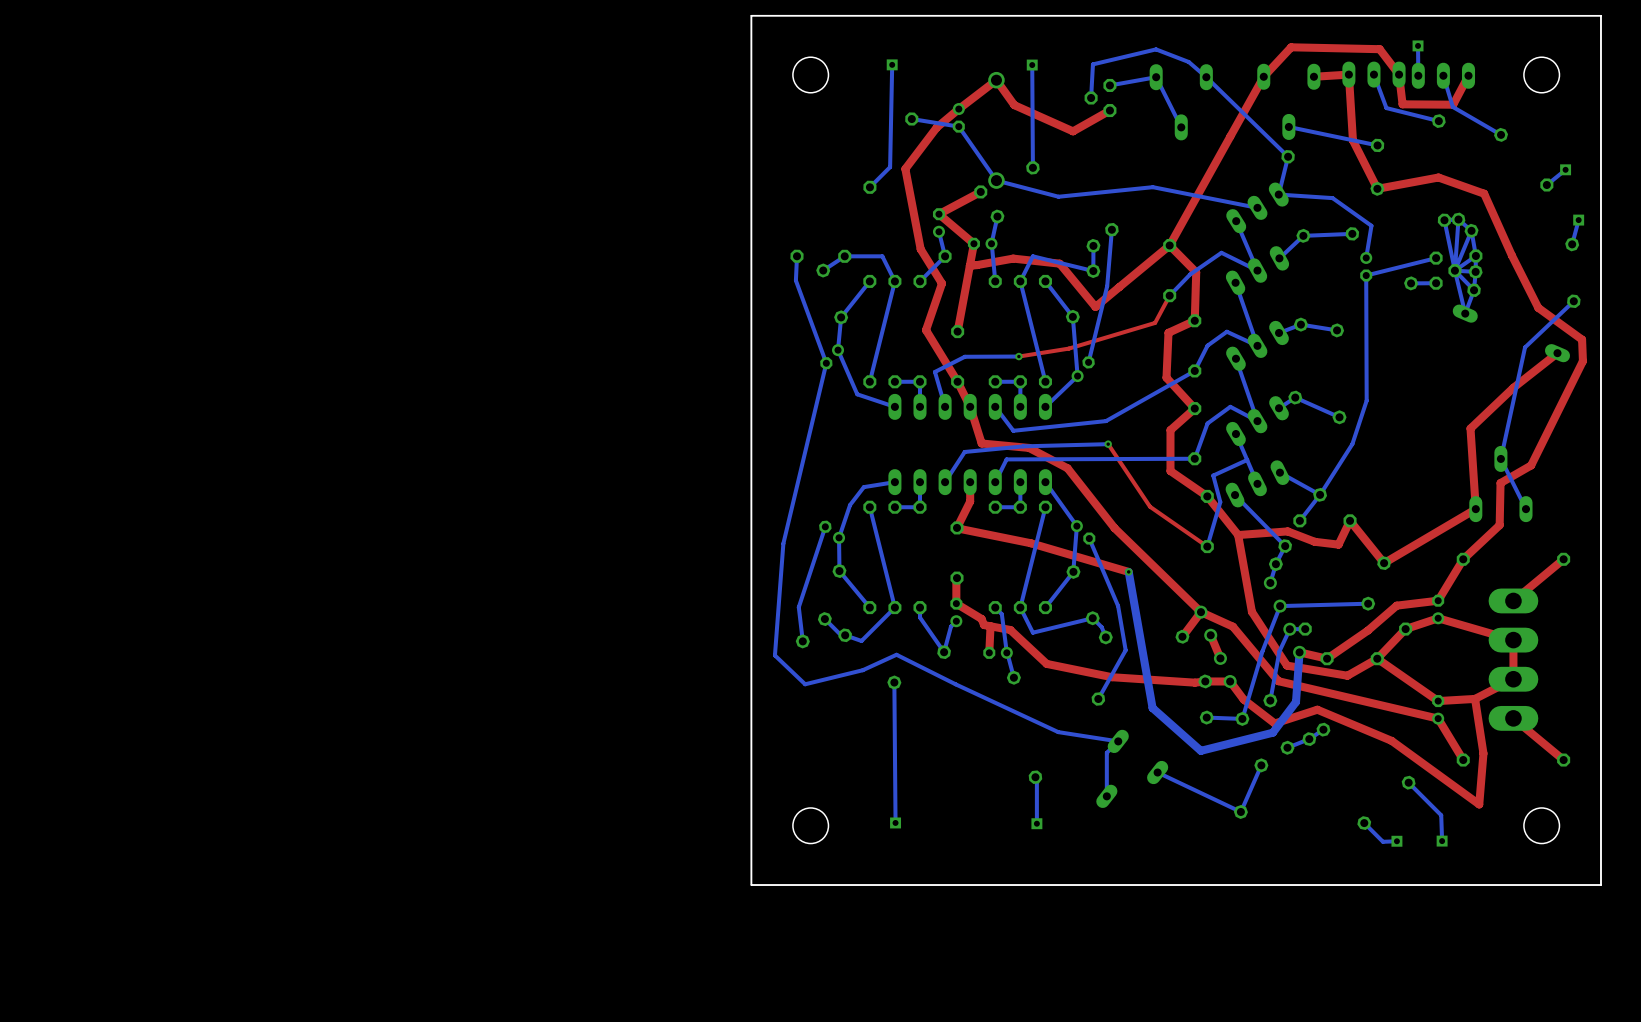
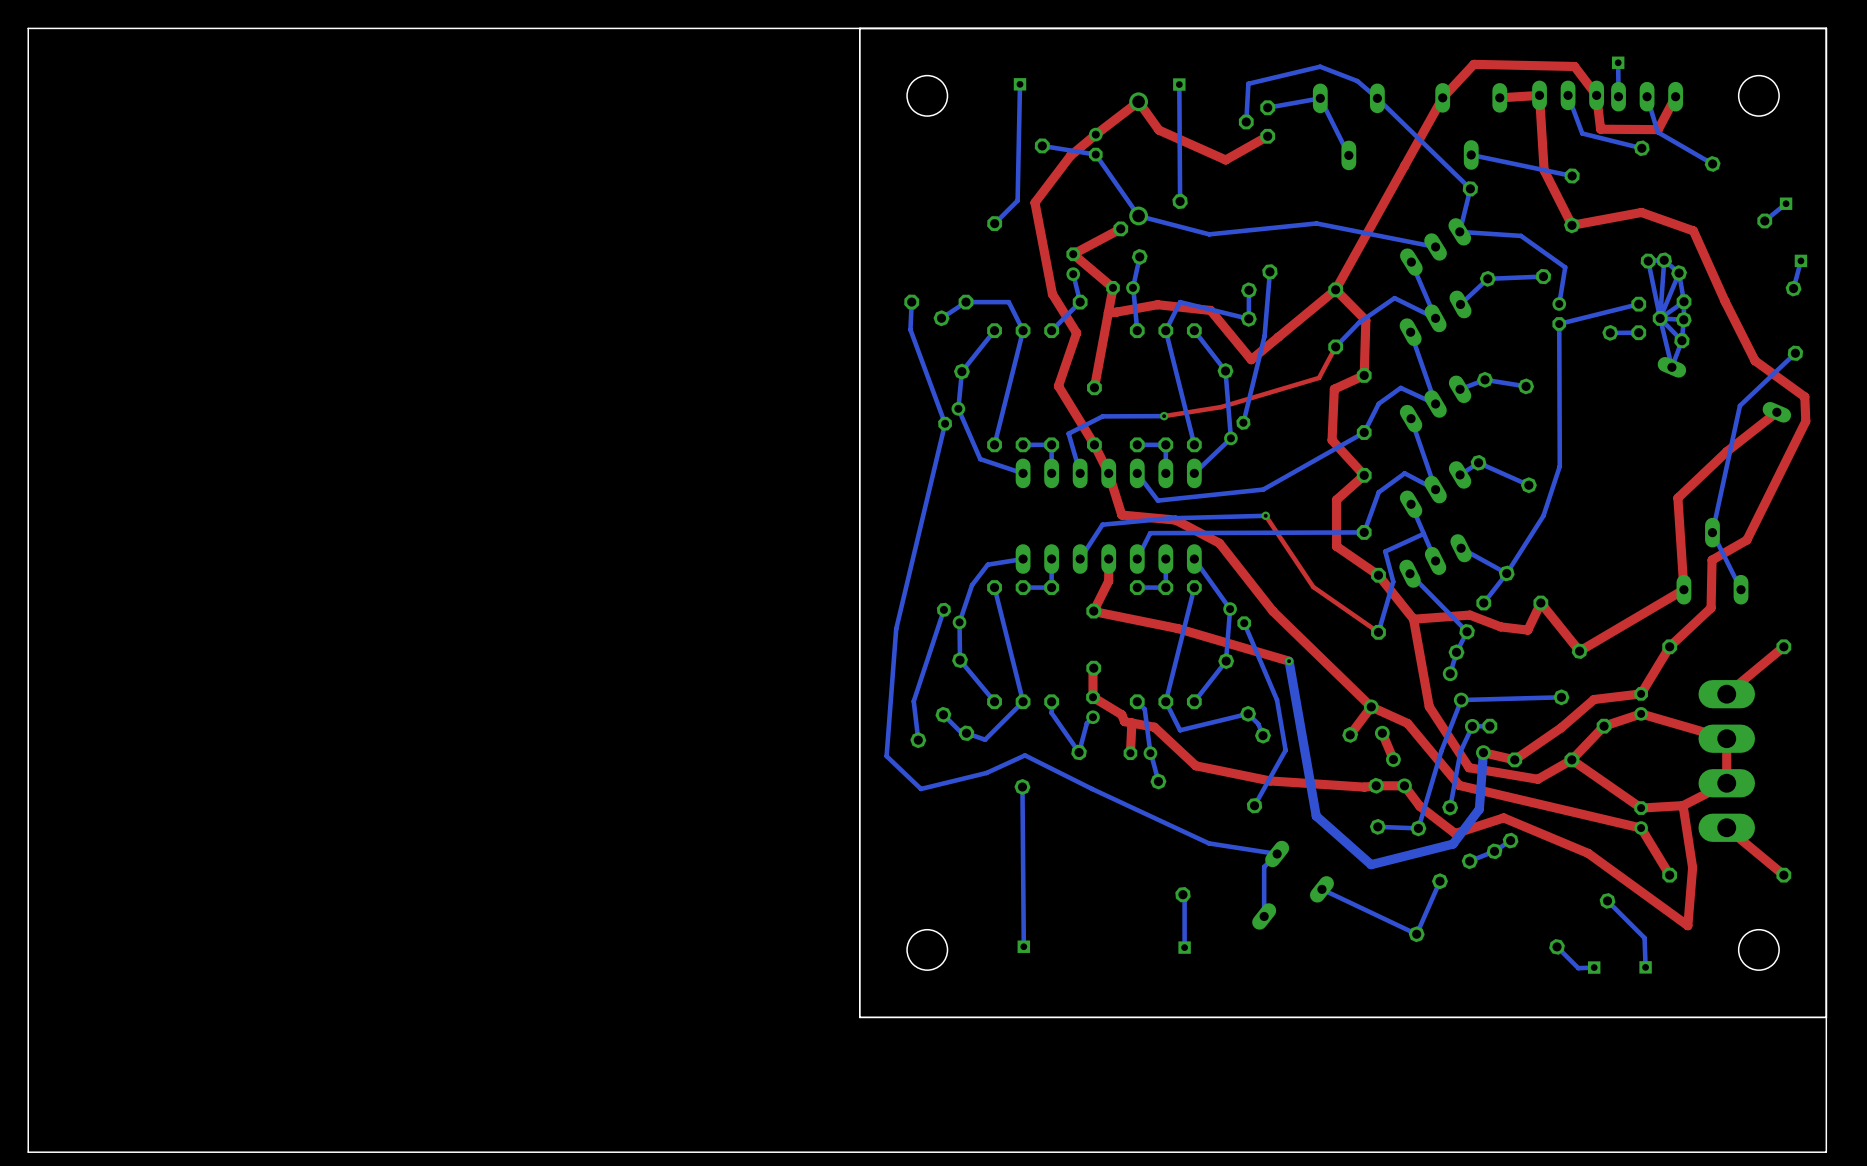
board edge: (751, 15) (751, 885) (1601, 885) -> (859, 28) (28, 28) (28, 1152) (1826, 1152) (1826, 1017)

